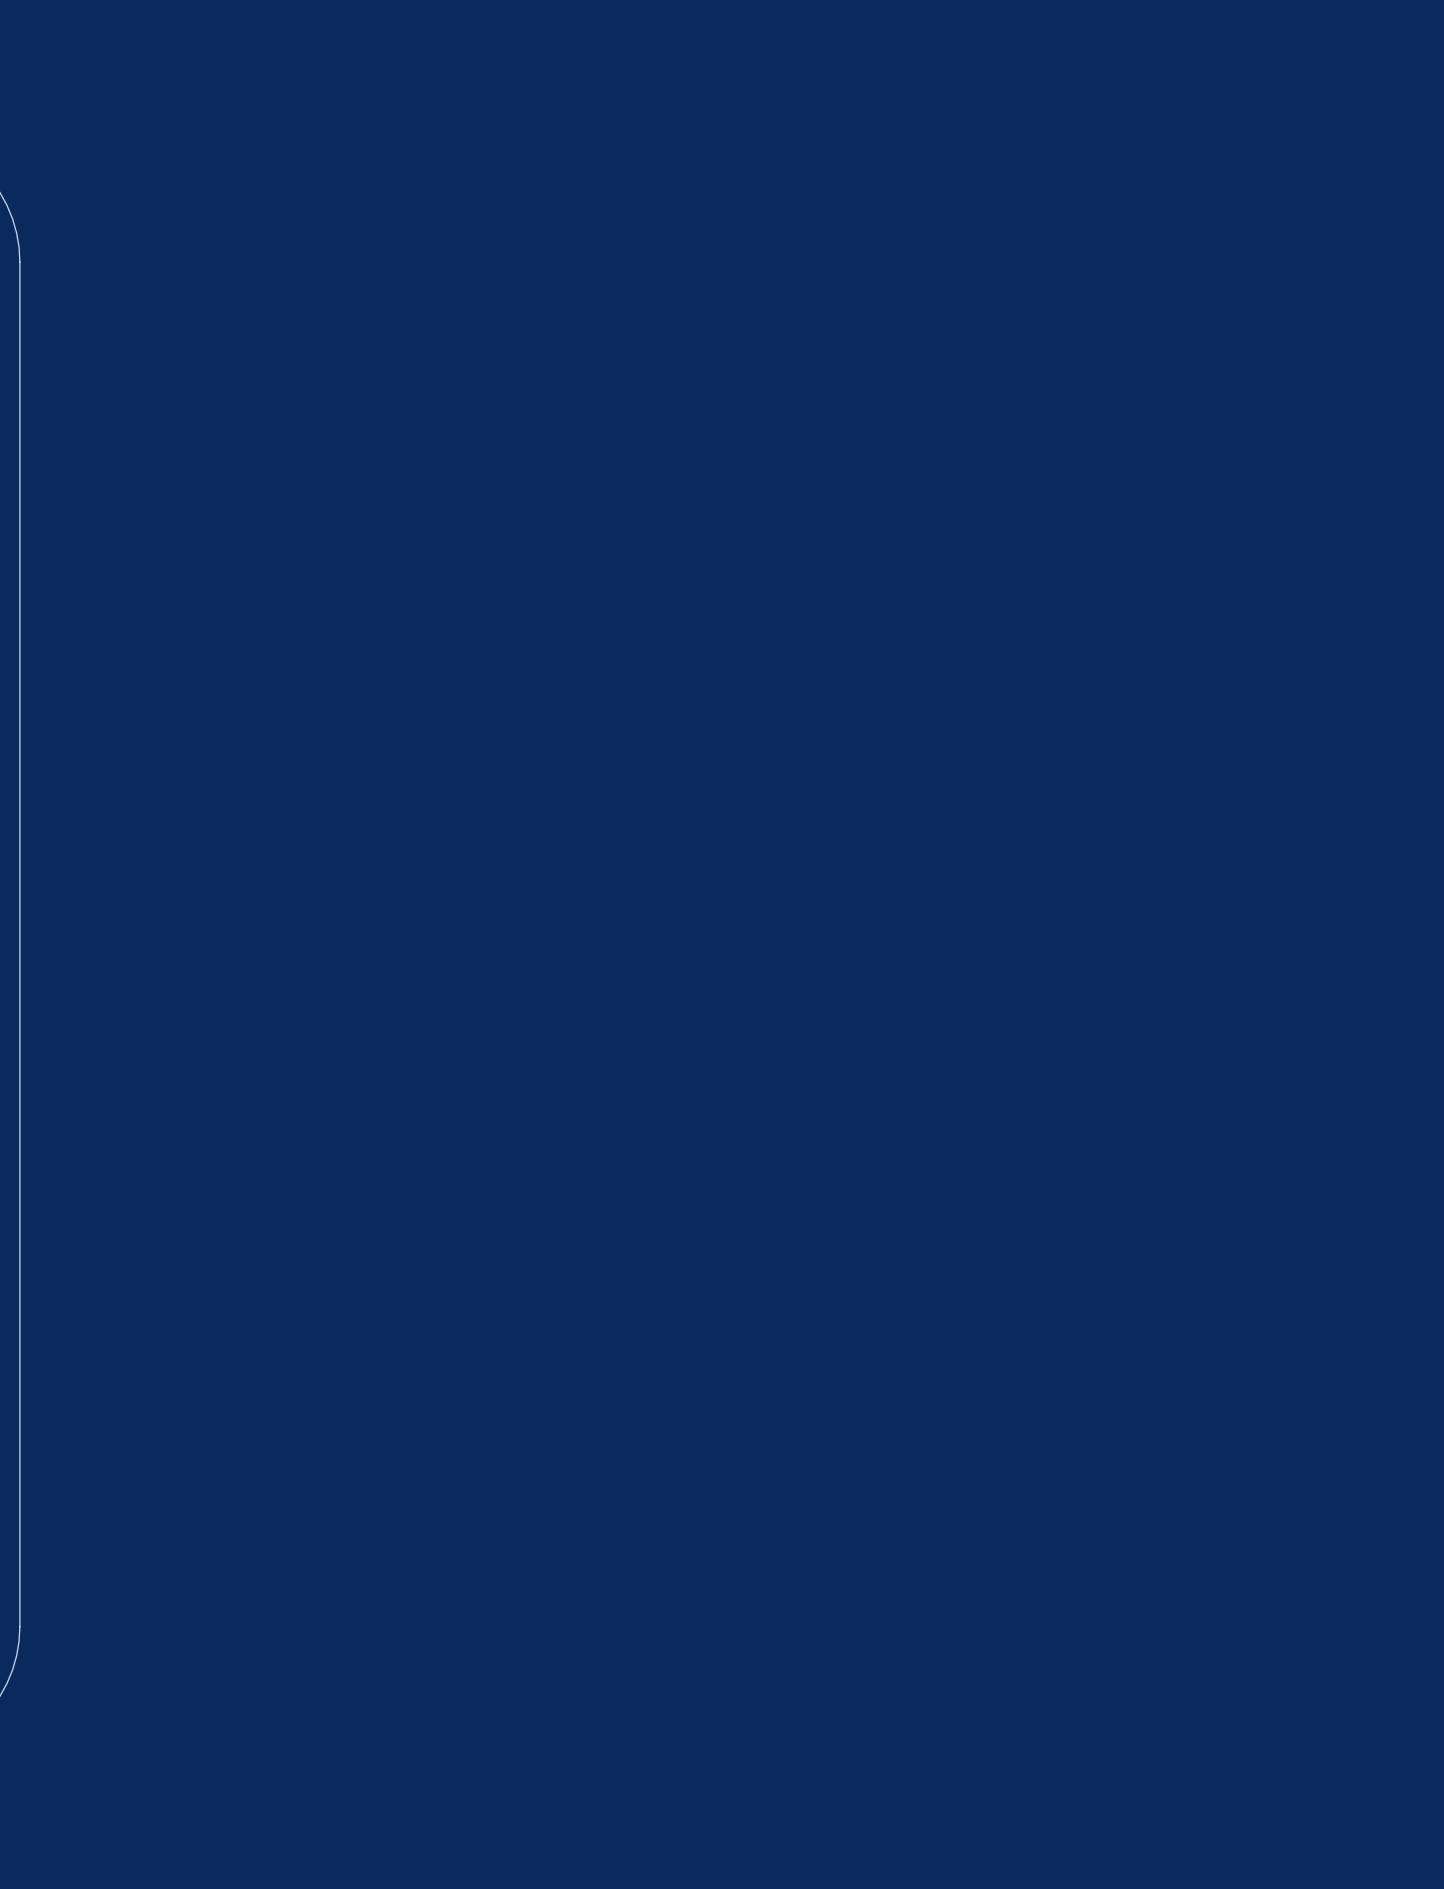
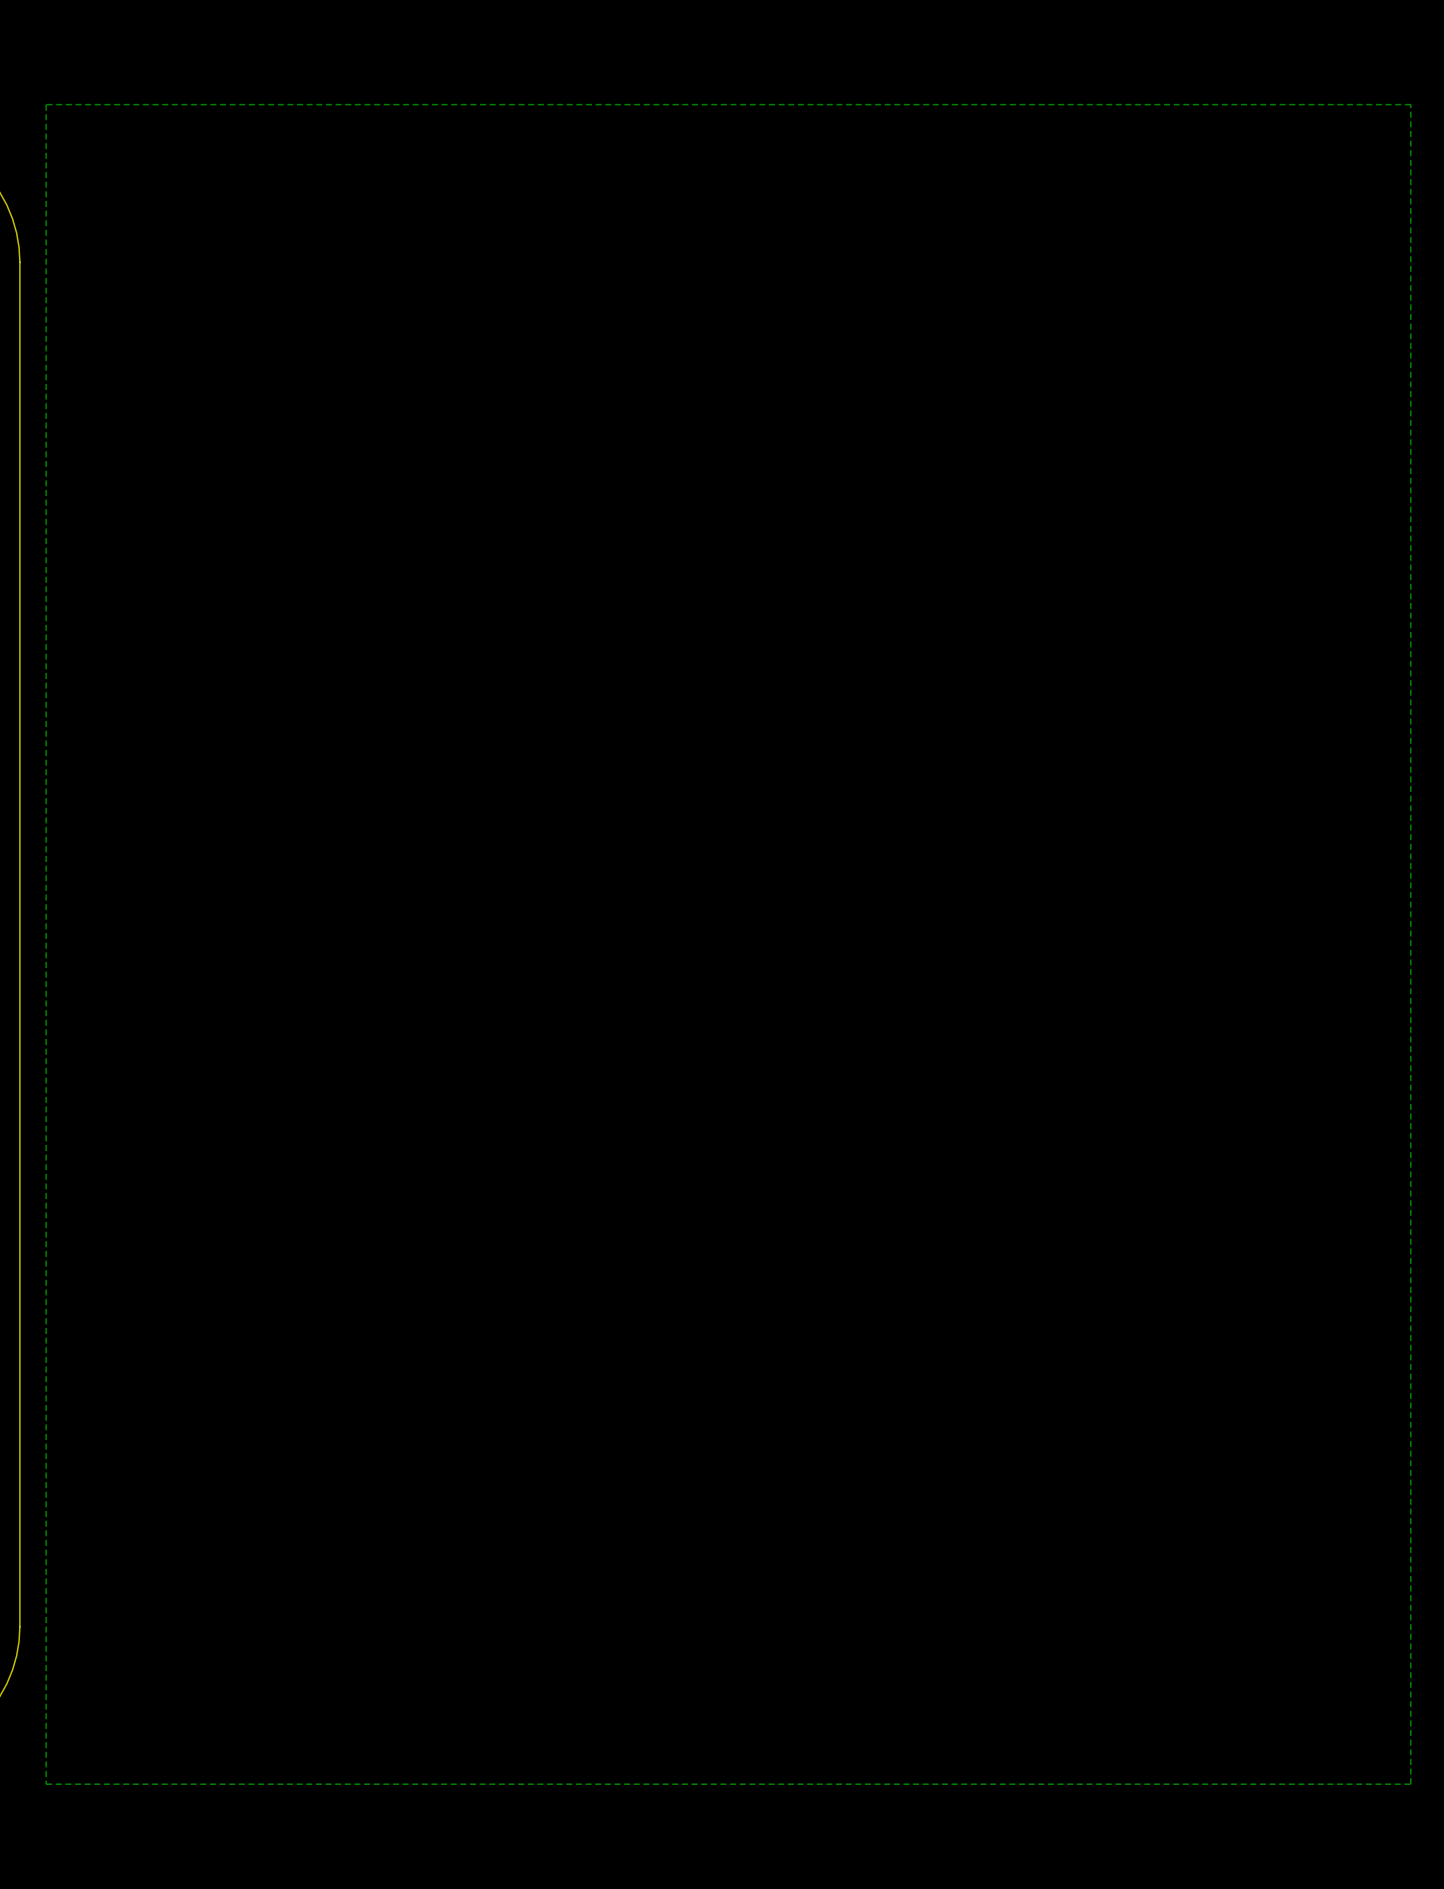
zone outline: none -> (1410, 104) (1410, 1784) (46, 1784) (46, 104) (1410, 104)

